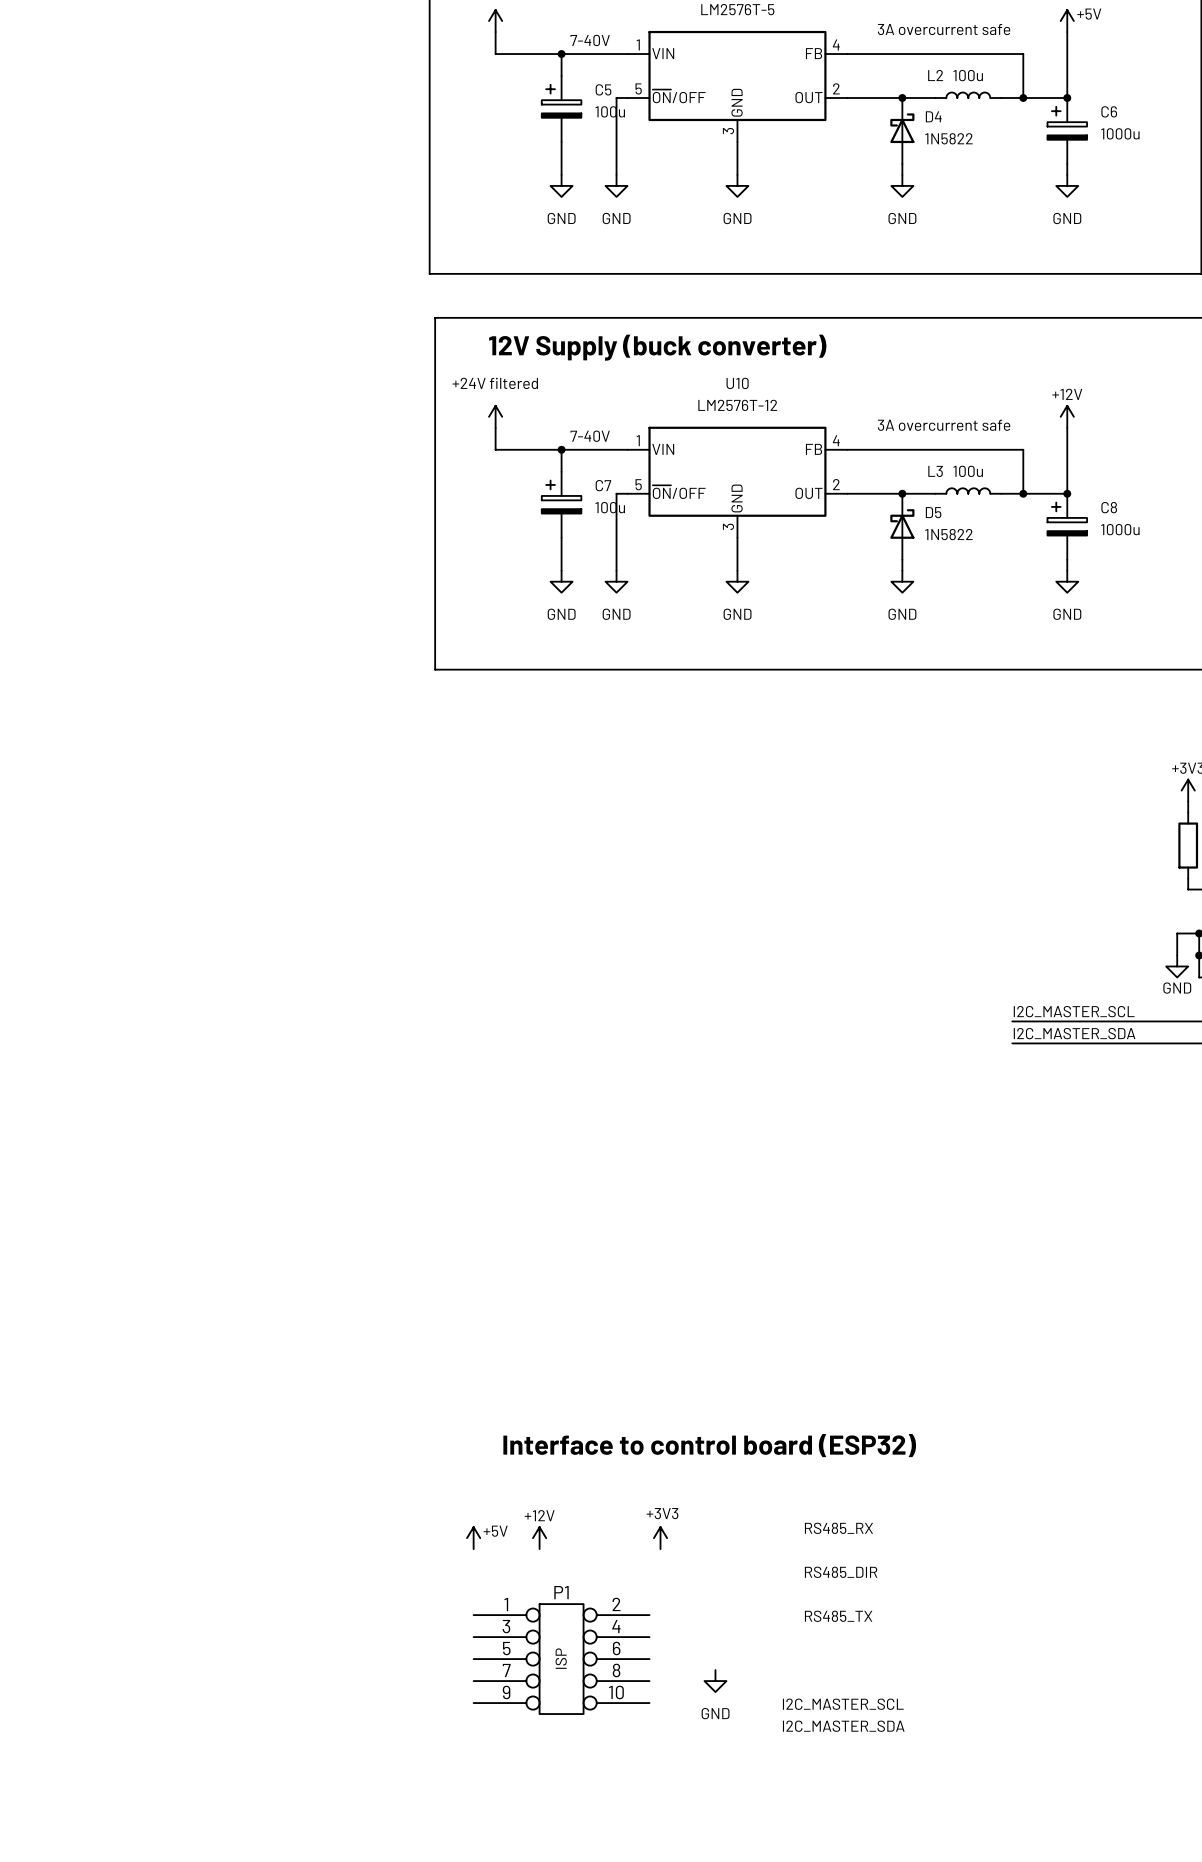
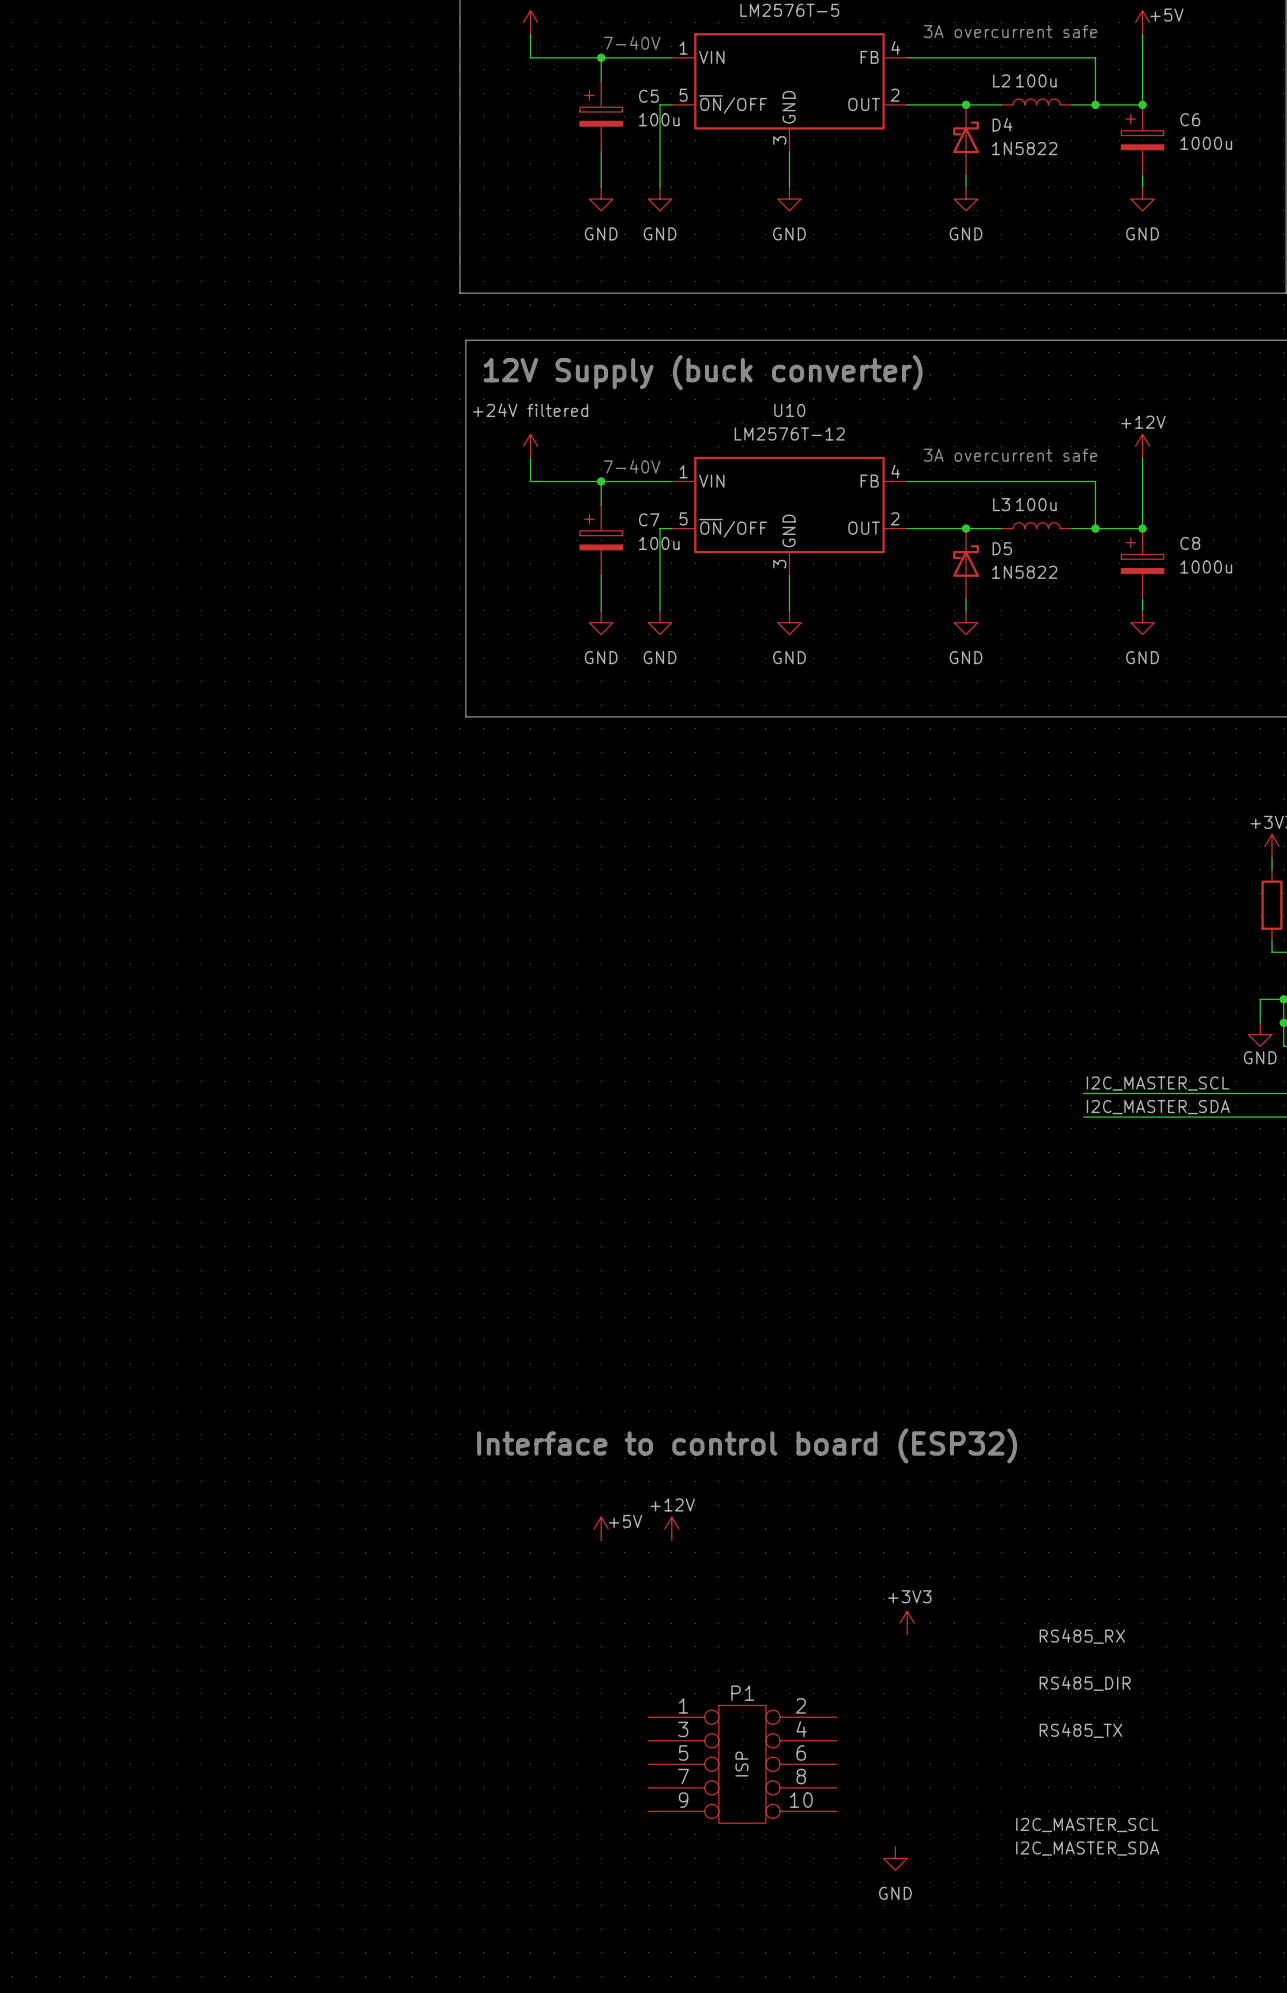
text position: Interface to control board (ESP32) (709, 1445) -> Interface to control board (ESP32) (747, 1445)
label position: RS485_RX (838, 1528) -> RS485_RX (1082, 1636)
power symbol position: +5V (473, 1538) -> +5V (601, 1528)
power symbol position: +12V (539, 1538) -> +12V (671, 1528)
power symbol position: +3V3 (660, 1538) -> +3V3 (907, 1623)
label position: RS485_DIR (841, 1572) -> RS485_DIR (1085, 1683)
label position: RS485_TX (838, 1616) -> RS485_TX (1080, 1730)
P1 position: (561, 1659) -> (742, 1764)
power symbol position: GND (715, 1681) -> GND (895, 1858)
label position: I2C_MASTER_SCL (843, 1704) -> I2C_MASTER_SCL (1087, 1824)
label position: I2C_MASTER_SDA (843, 1726) -> I2C_MASTER_SDA (1087, 1848)

